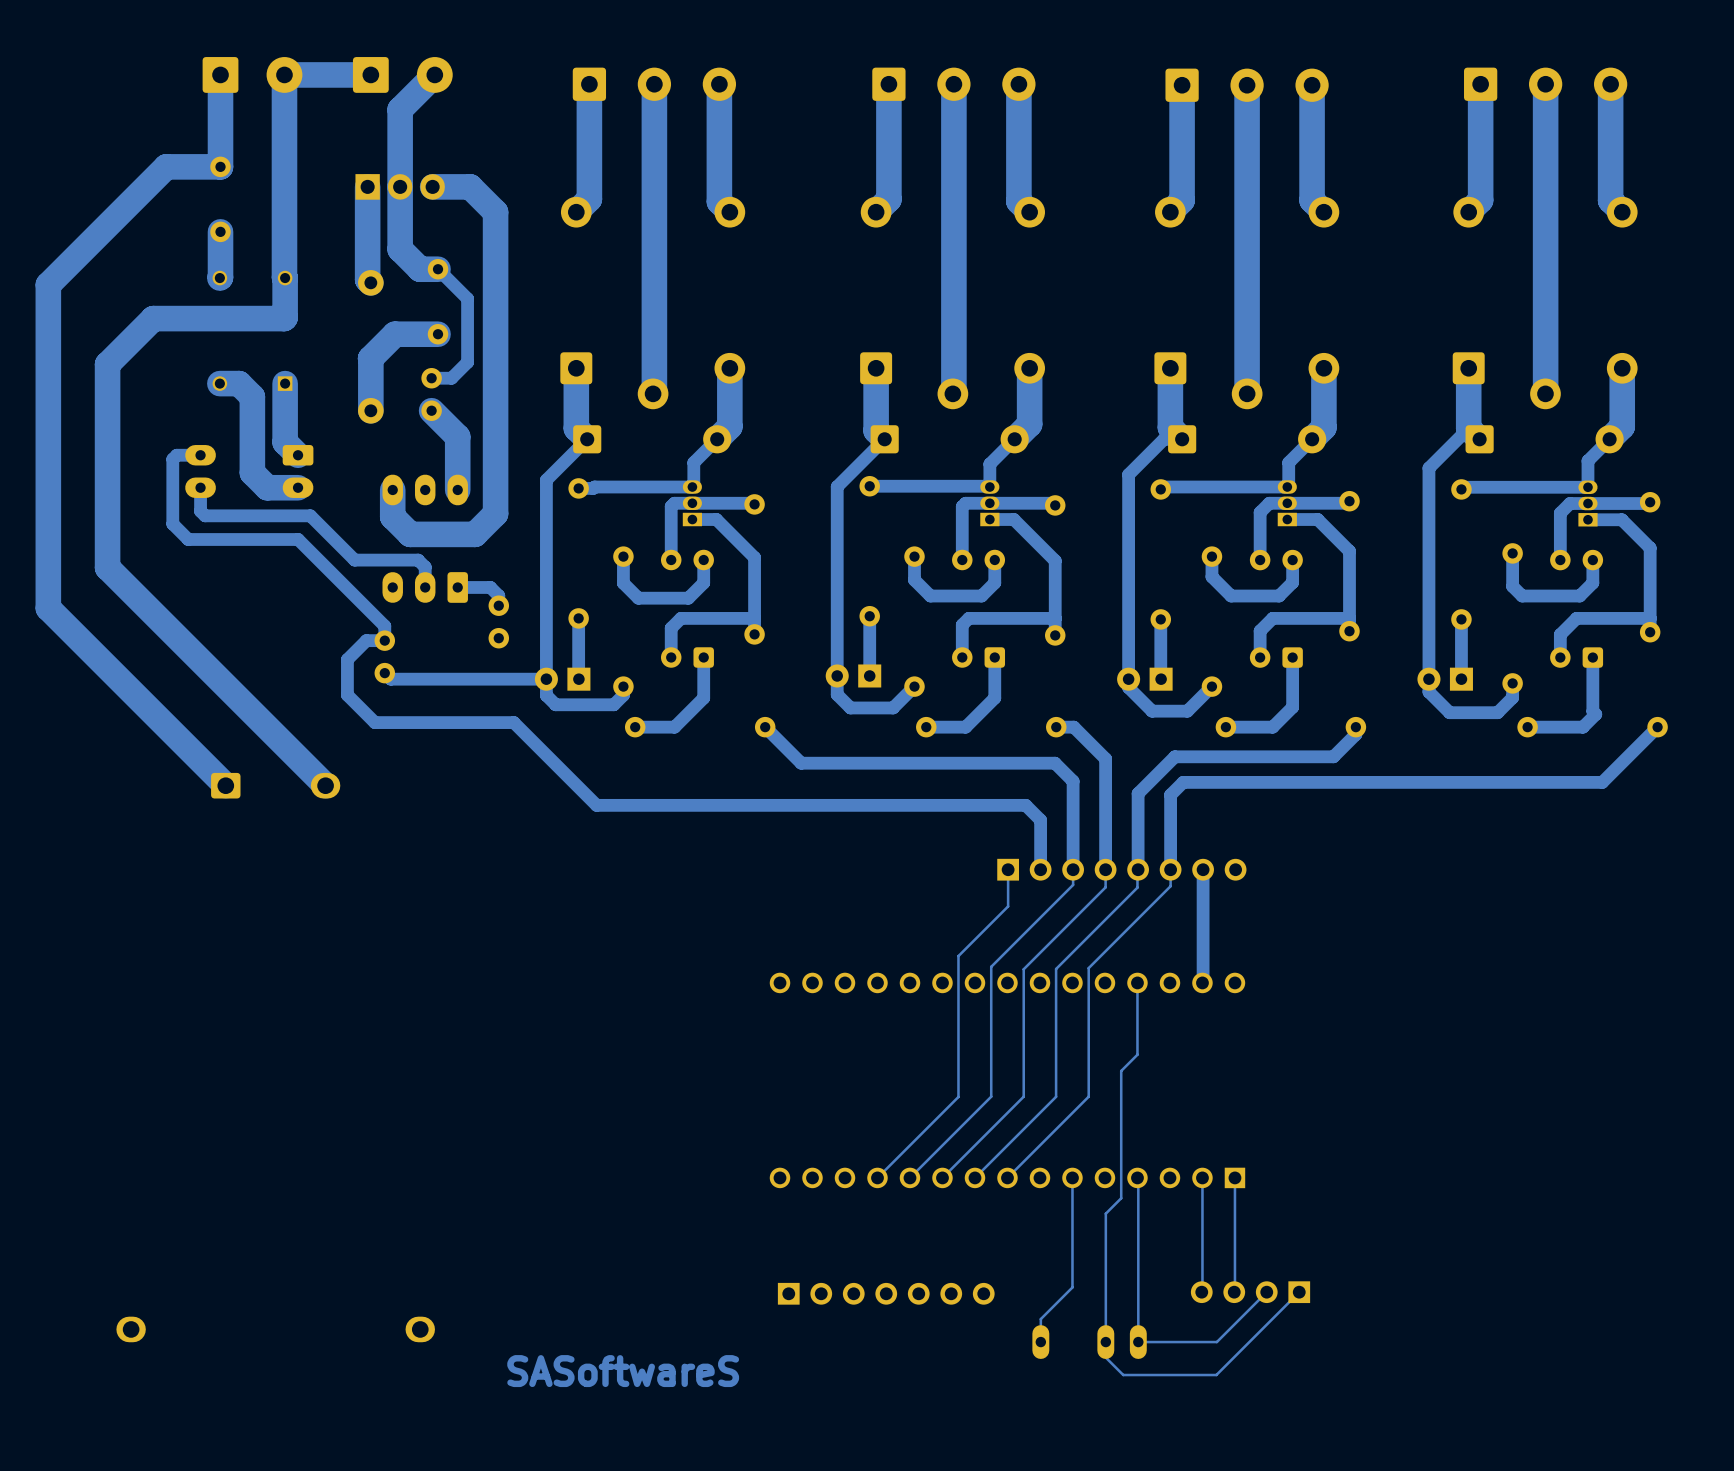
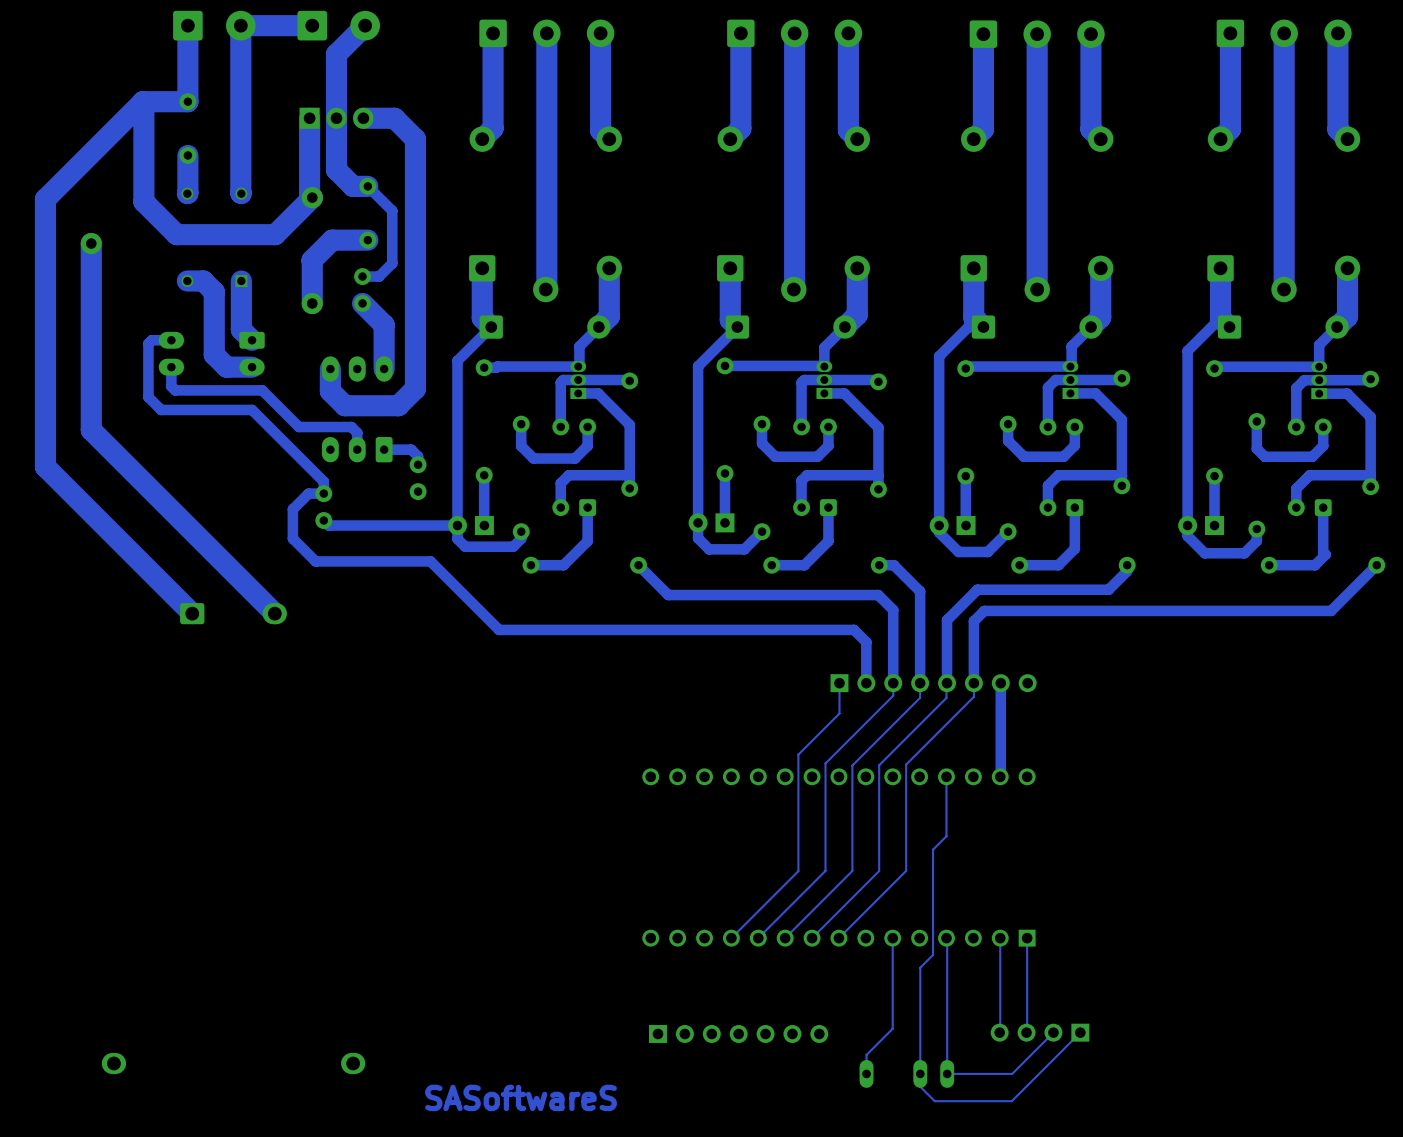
track: none -> (143, 101) (143, 201) (176, 234) (275, 234) (312, 197)
track: (285, 278) (284, 318) (153, 318) (107, 364) (107, 567) -> (91, 243) (91, 430) (94, 433)
via: none -> (91, 243)

